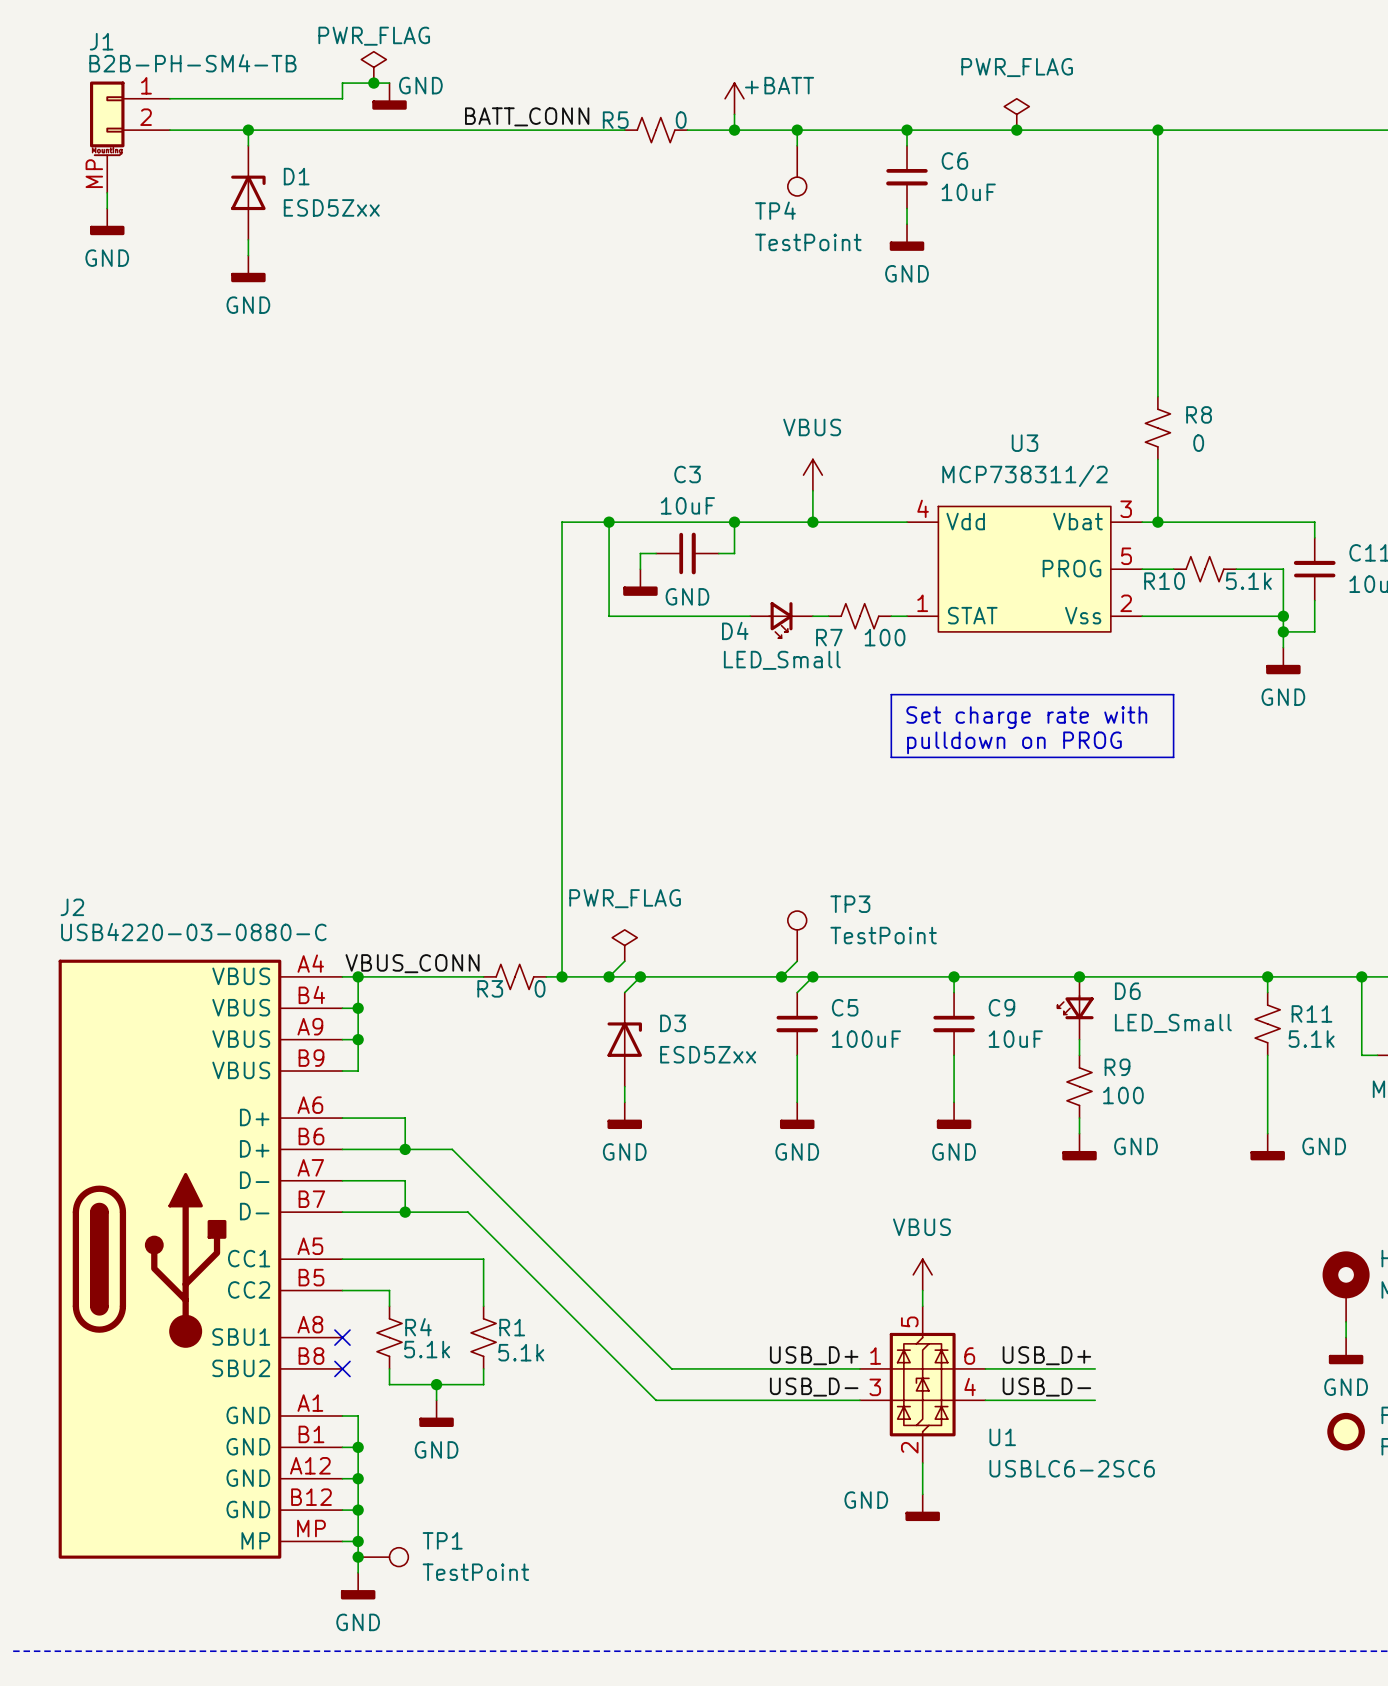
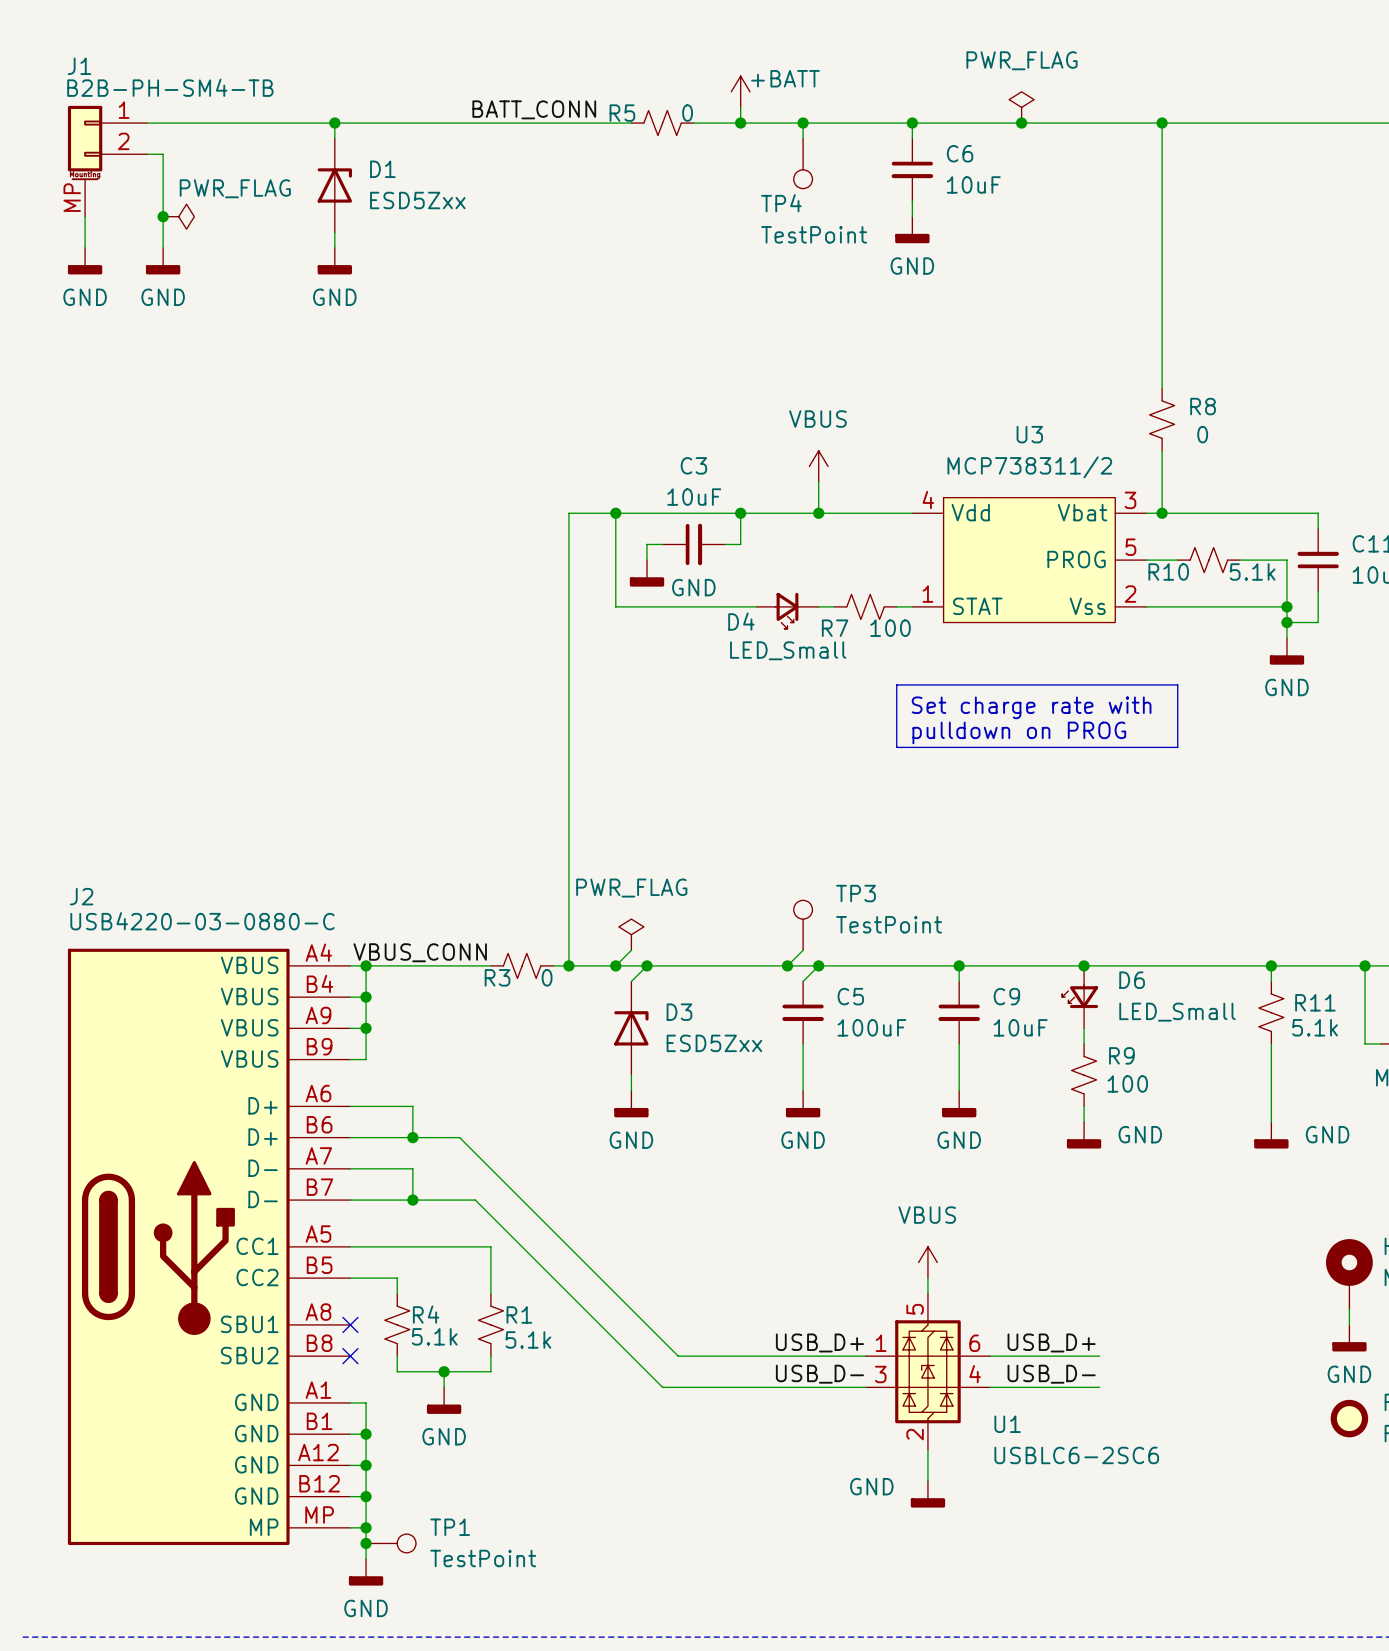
power symbol text position: PWR_FLAG (374, 36) -> PWR_FLAG (235, 188)
power symbol rotation: 0° (373, 67) -> 90° clockwise (178, 216)
power symbol position: PWR_FLAG (373, 67) -> PWR_FLAG (178, 216)
junction: (373, 83) -> none
wire: (389, 83) (342, 83) (342, 98) (169, 98) -> none
power symbol: GND (389, 96) -> none
wire: (248, 130) (248, 145) -> (334, 123) (334, 138)
junction: (248, 130) -> none
junction: none -> (334, 123)
J1 position: (129, 137) -> (107, 161)
wire: none -> (147, 154) (163, 154) (163, 247)
wire: (107, 192) (107, 208) -> none
D1 position: (248, 192) -> (334, 185)
power symbol: GND (107, 221) -> none
wire: none -> (85, 216) (85, 247)
junction: none -> (163, 216)
wire: (248, 239) (248, 255) -> (334, 232) (334, 247)
power symbol: none -> GND (85, 261)
power symbol: none -> GND (163, 261)
power symbol: GND (248, 268) -> none
power symbol: none -> GND (334, 261)

